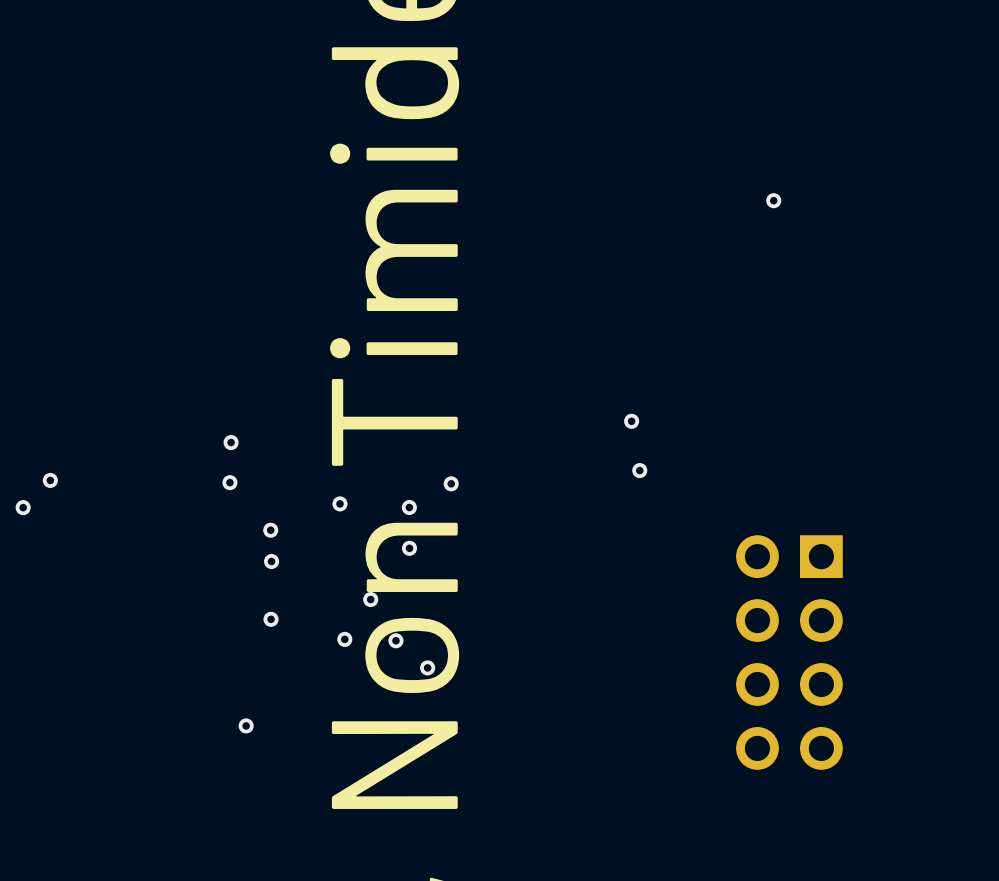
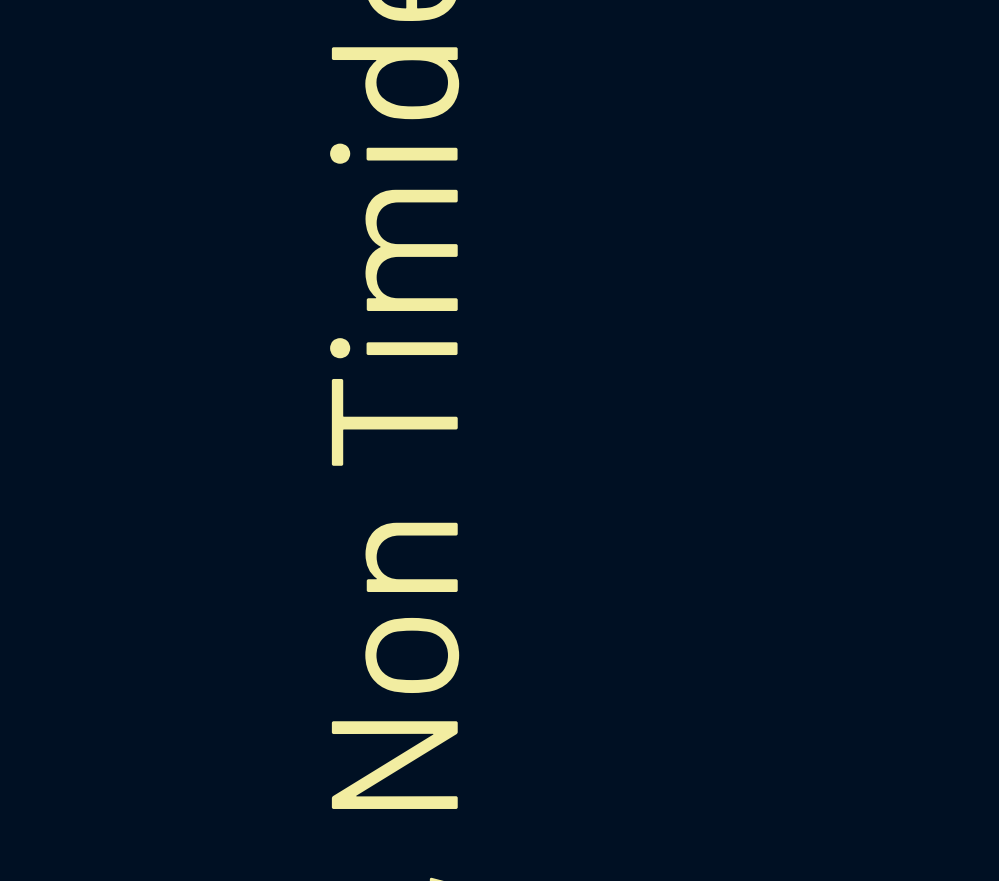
via: (773, 200) -> none
via: (631, 421) -> none
via: (231, 442) -> none
via: (639, 470) -> none
via: (50, 480) -> none
via: (229, 482) -> none
via: (451, 483) -> none
via: (339, 503) -> none
via: (23, 507) -> none
via: (409, 507) -> none
via: (270, 530) -> none
via: (409, 548) -> none
via: (271, 561) -> none
via: (370, 599) -> none
via: (271, 619) -> none
via: (344, 639) -> none
via: (395, 640) -> none
part: (789, 652) -> none
via: (427, 667) -> none
via: (246, 725) -> none

